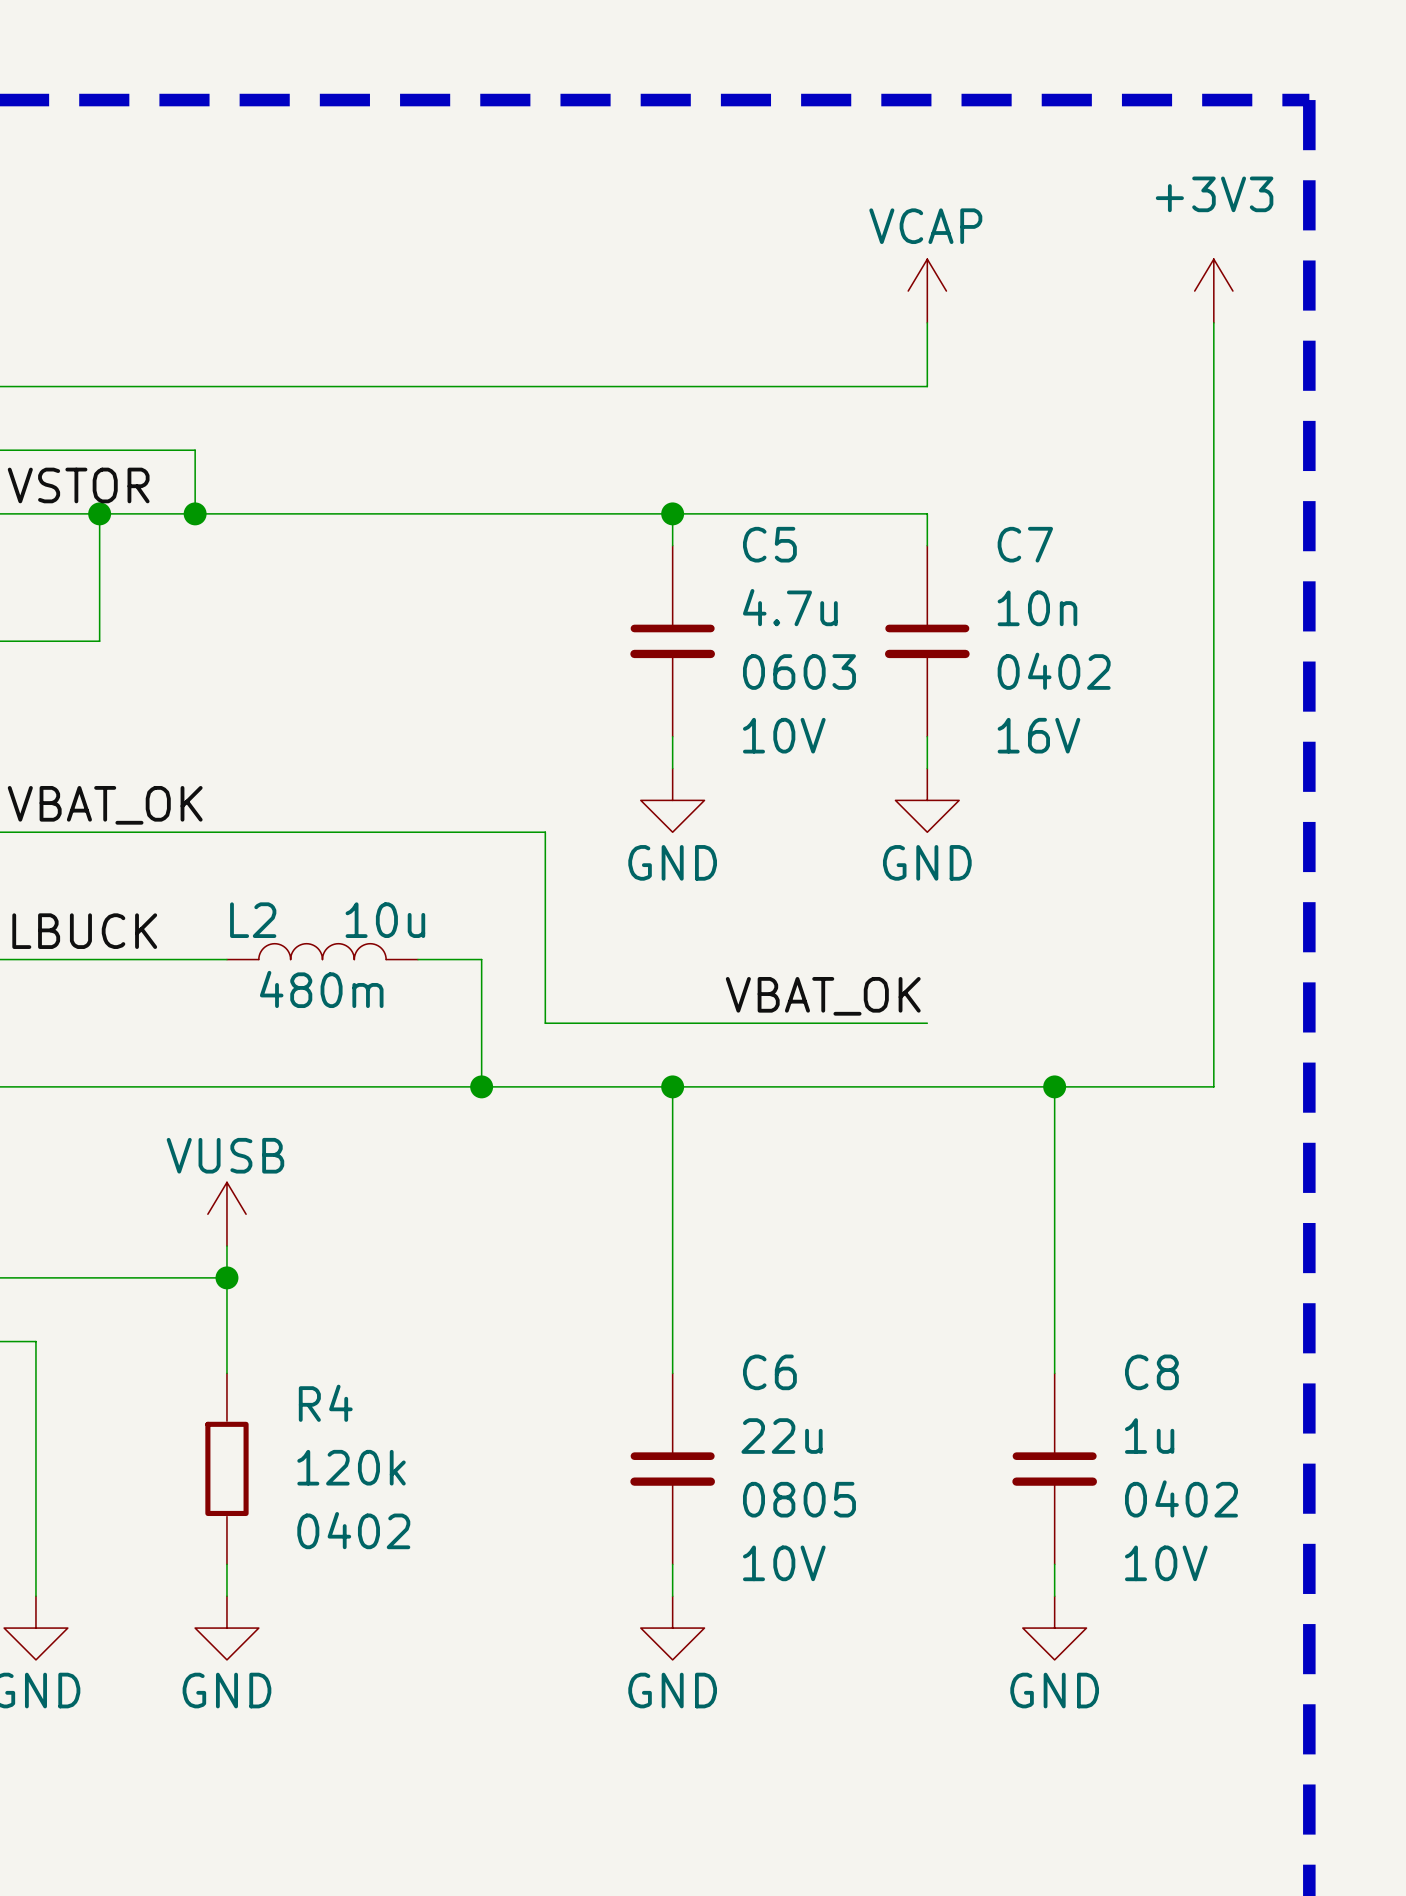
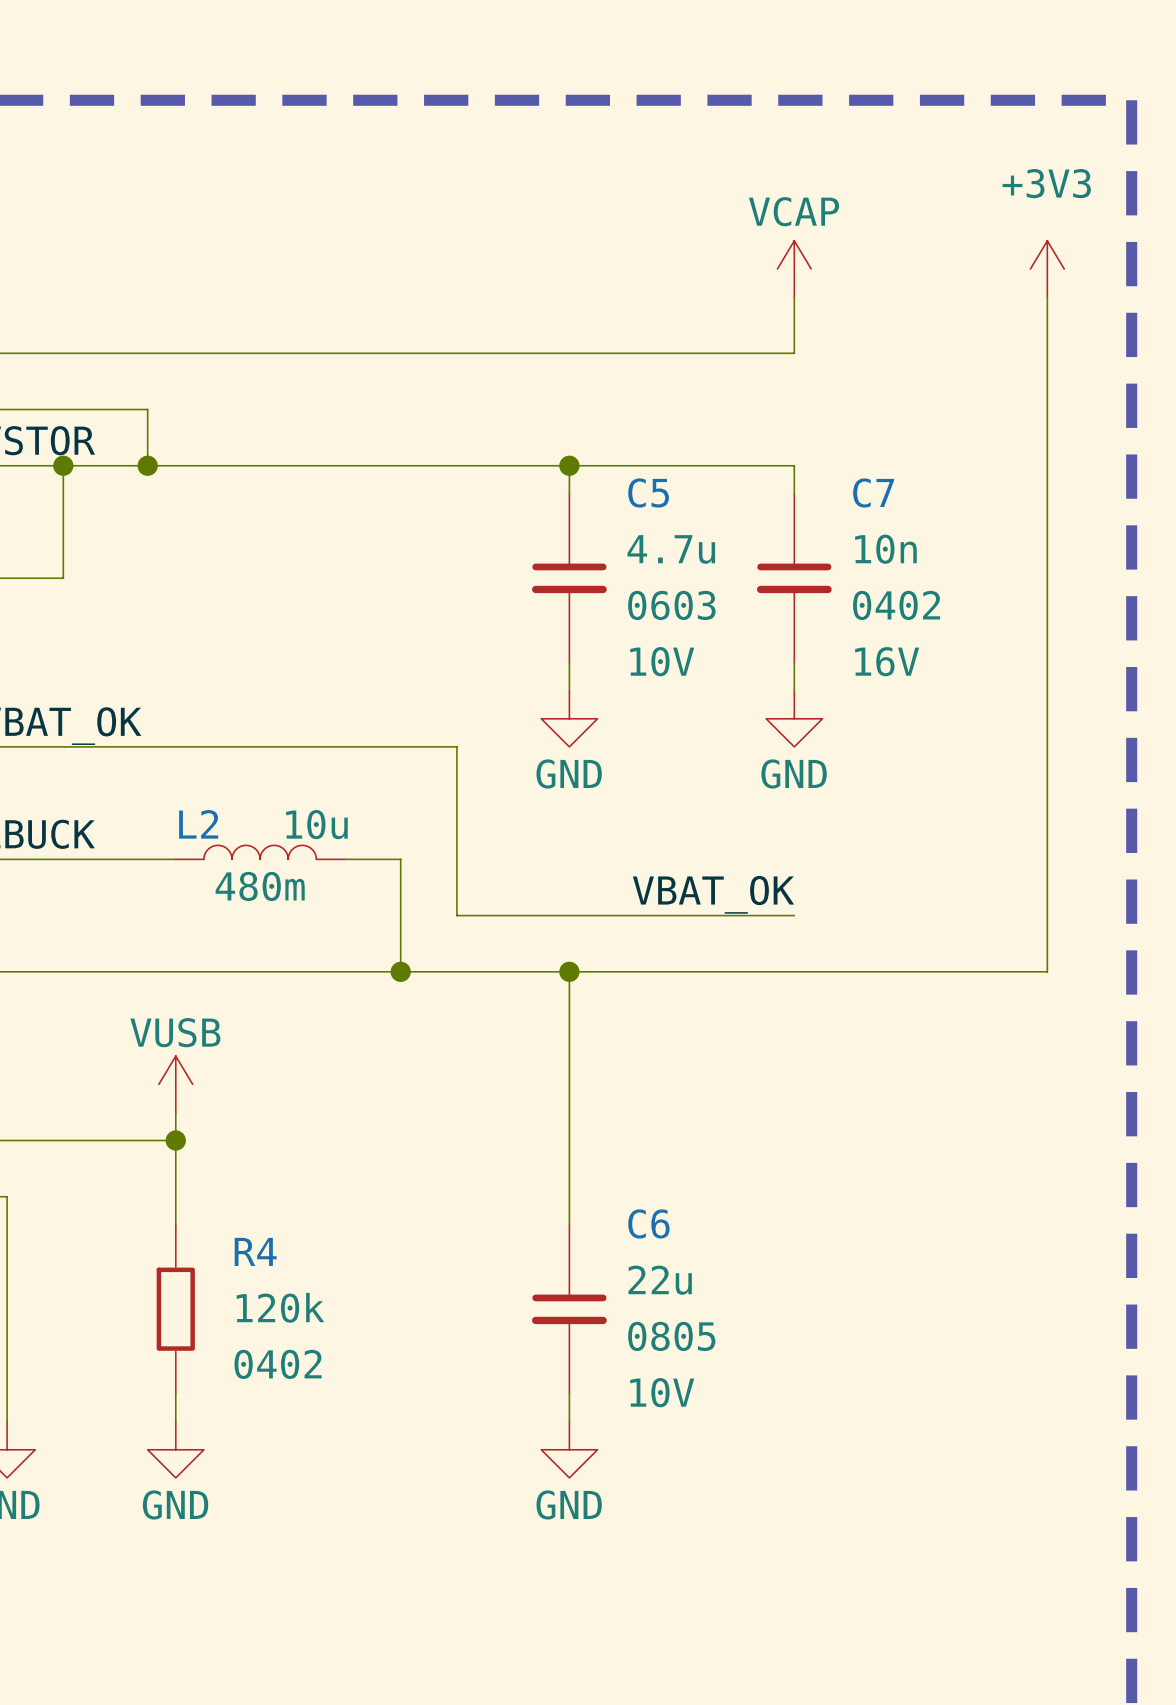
wire: (1054, 1086) (1054, 1373) -> none
junction: (1054, 1086) -> none
C8: 1u (1054, 1468) -> none
wire: (1054, 1564) (1054, 1596) -> none
power symbol: GND (1054, 1628) -> none

